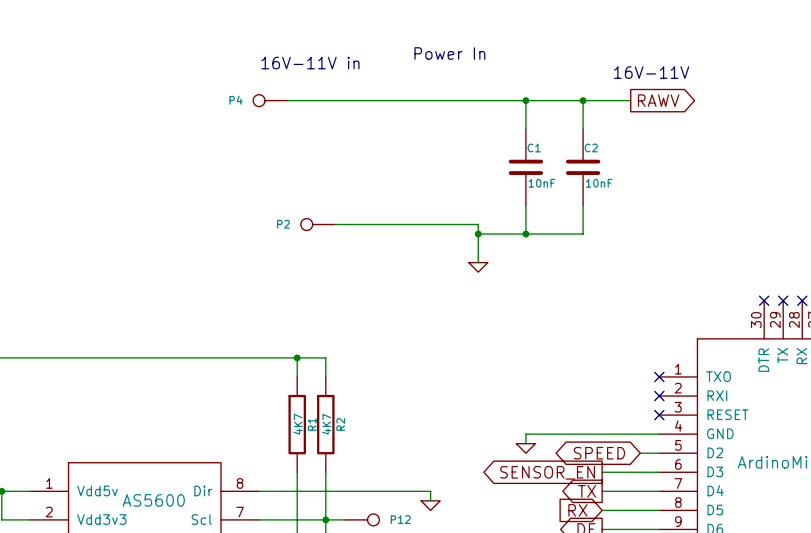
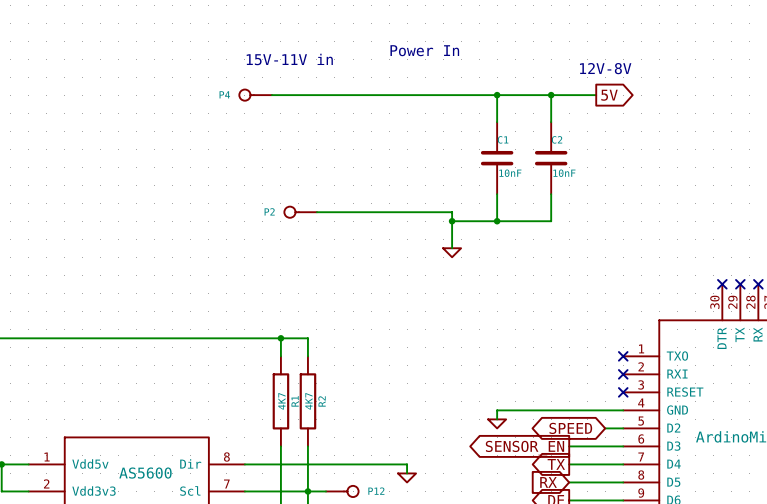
text: 16V-11V in (310, 63) -> 15V-11V in (289, 59)
text: 16V-11V (651, 72) -> 12V-8V (605, 68)
global label: RAWV (658, 100) -> 5V (609, 95)

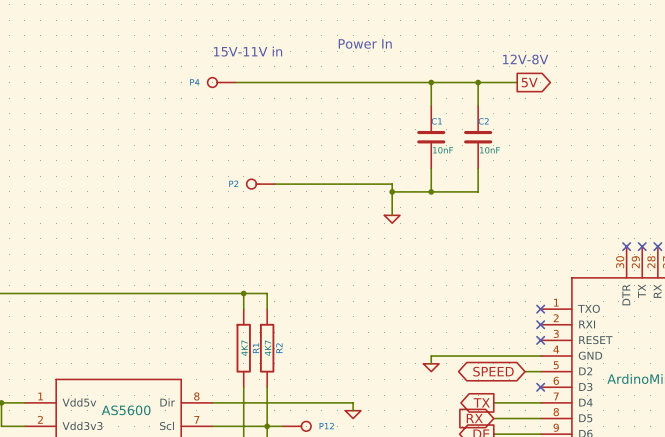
wire: (569, 446) (623, 446) -> none
no-connect mark: none -> (540, 387)
global label: SENSOR_EN (524, 448) -> none

